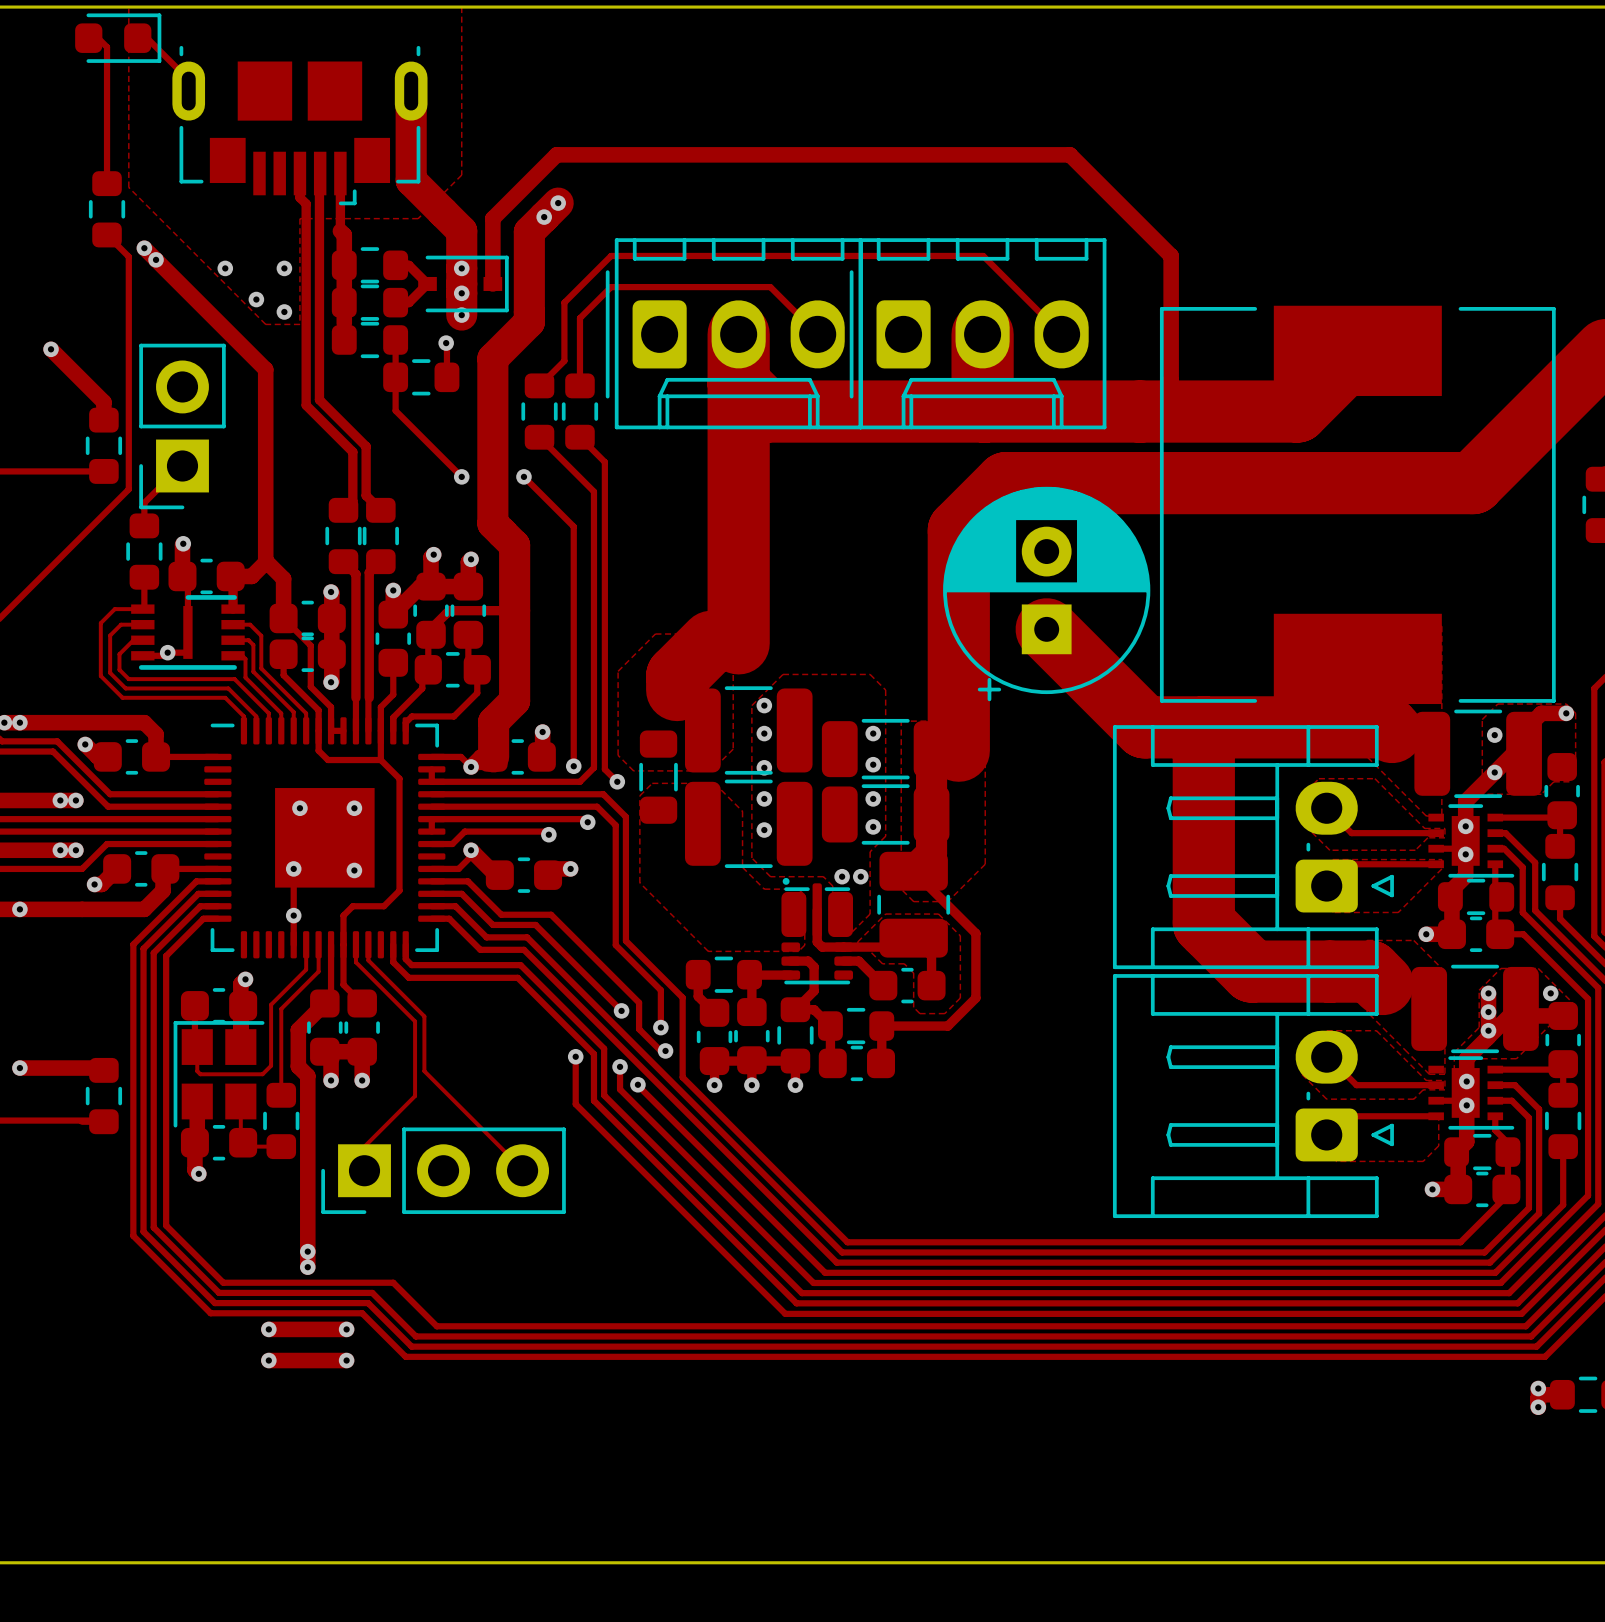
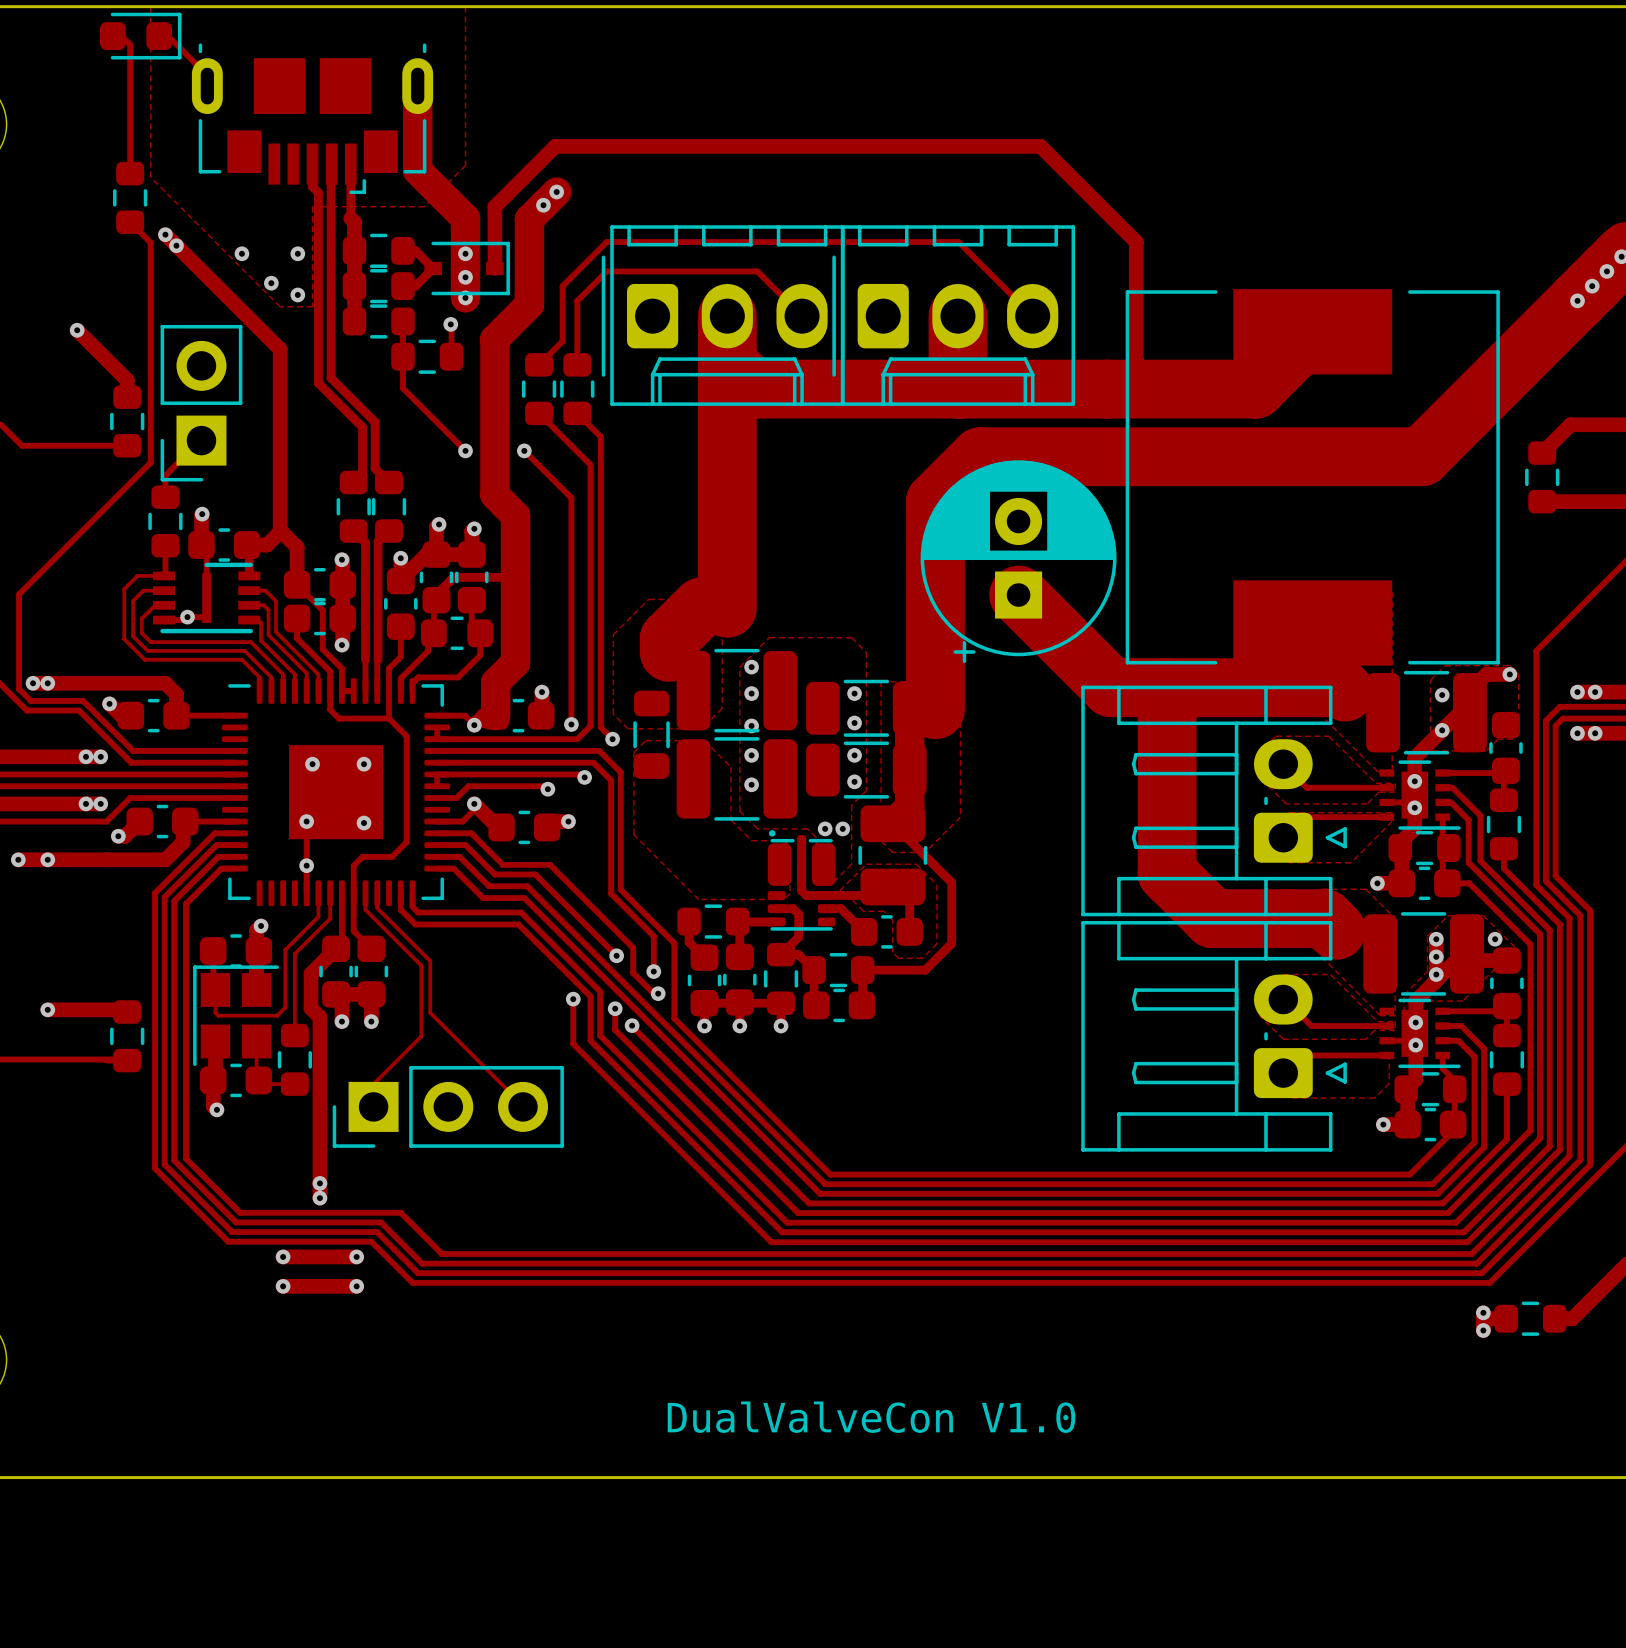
text: none -> DualValveCon V1.0 (871, 1417)

